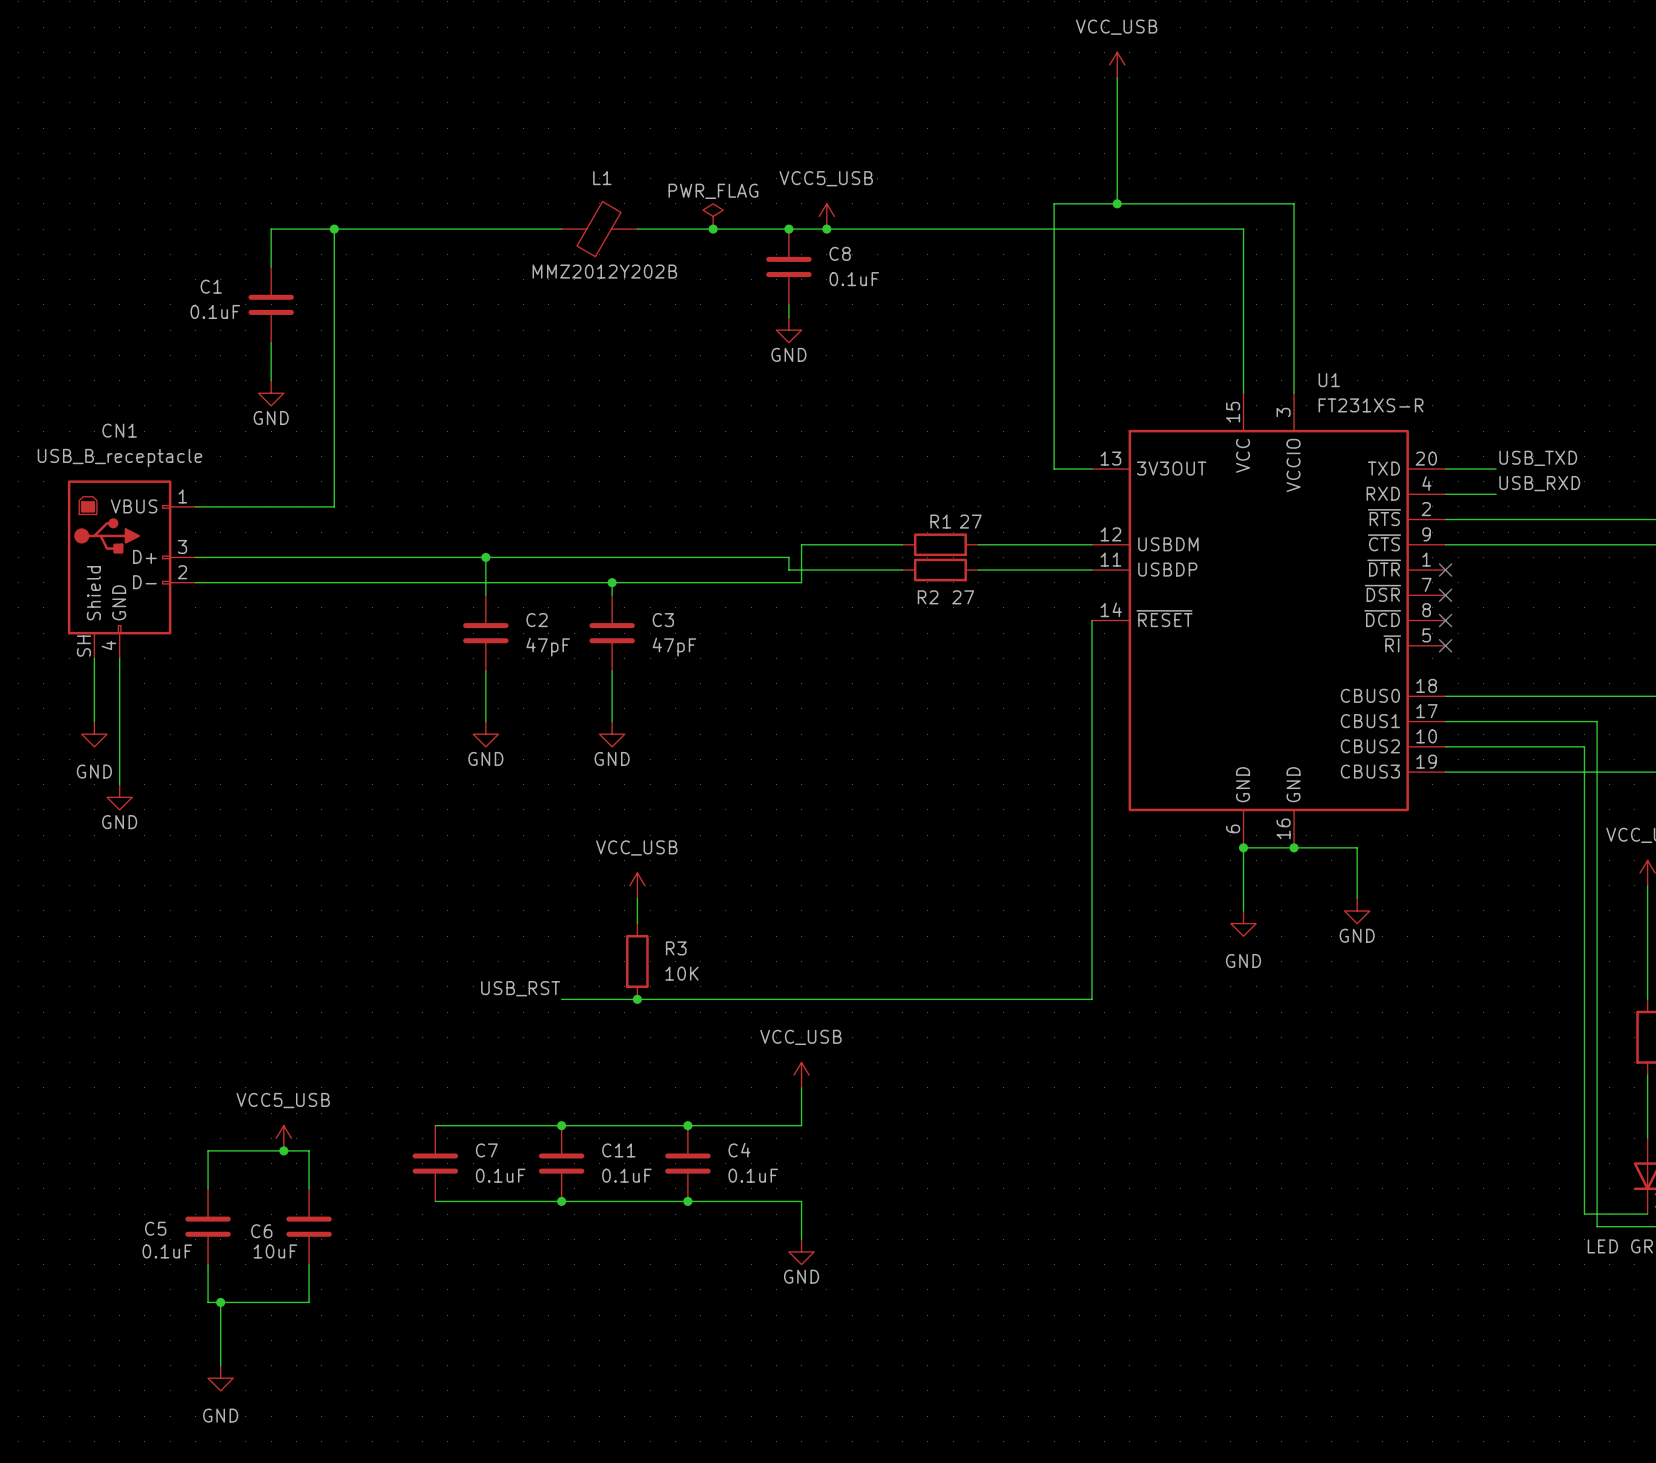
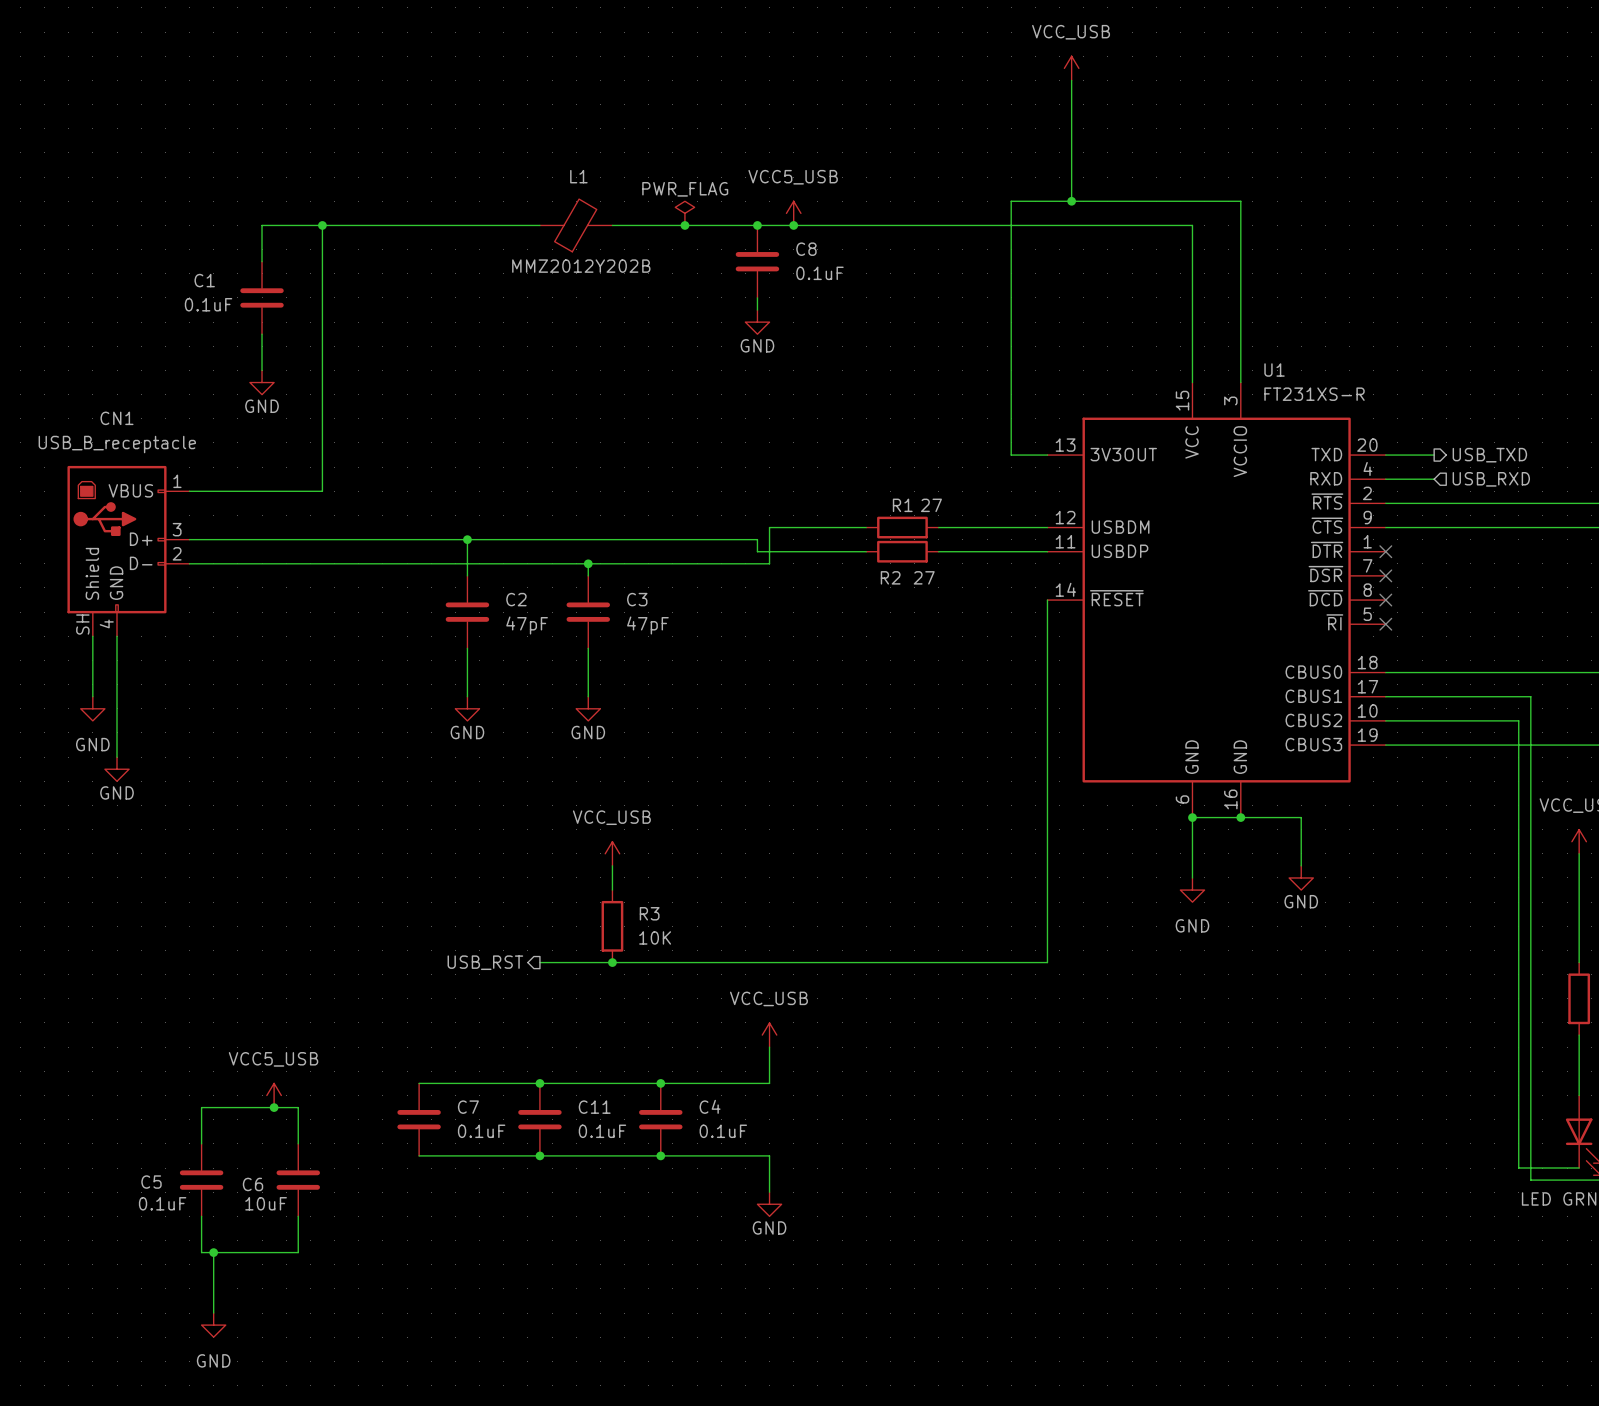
label: USB_TXD (1538, 458) -> none
hierarchical label: none -> USB_TXD (1489, 455)
label: USB_RXD (1539, 483) -> none
hierarchical label: none -> USB_RXD (1491, 479)
label: USB_RST (520, 988) -> none
hierarchical label: none -> USB_RST (485, 962)

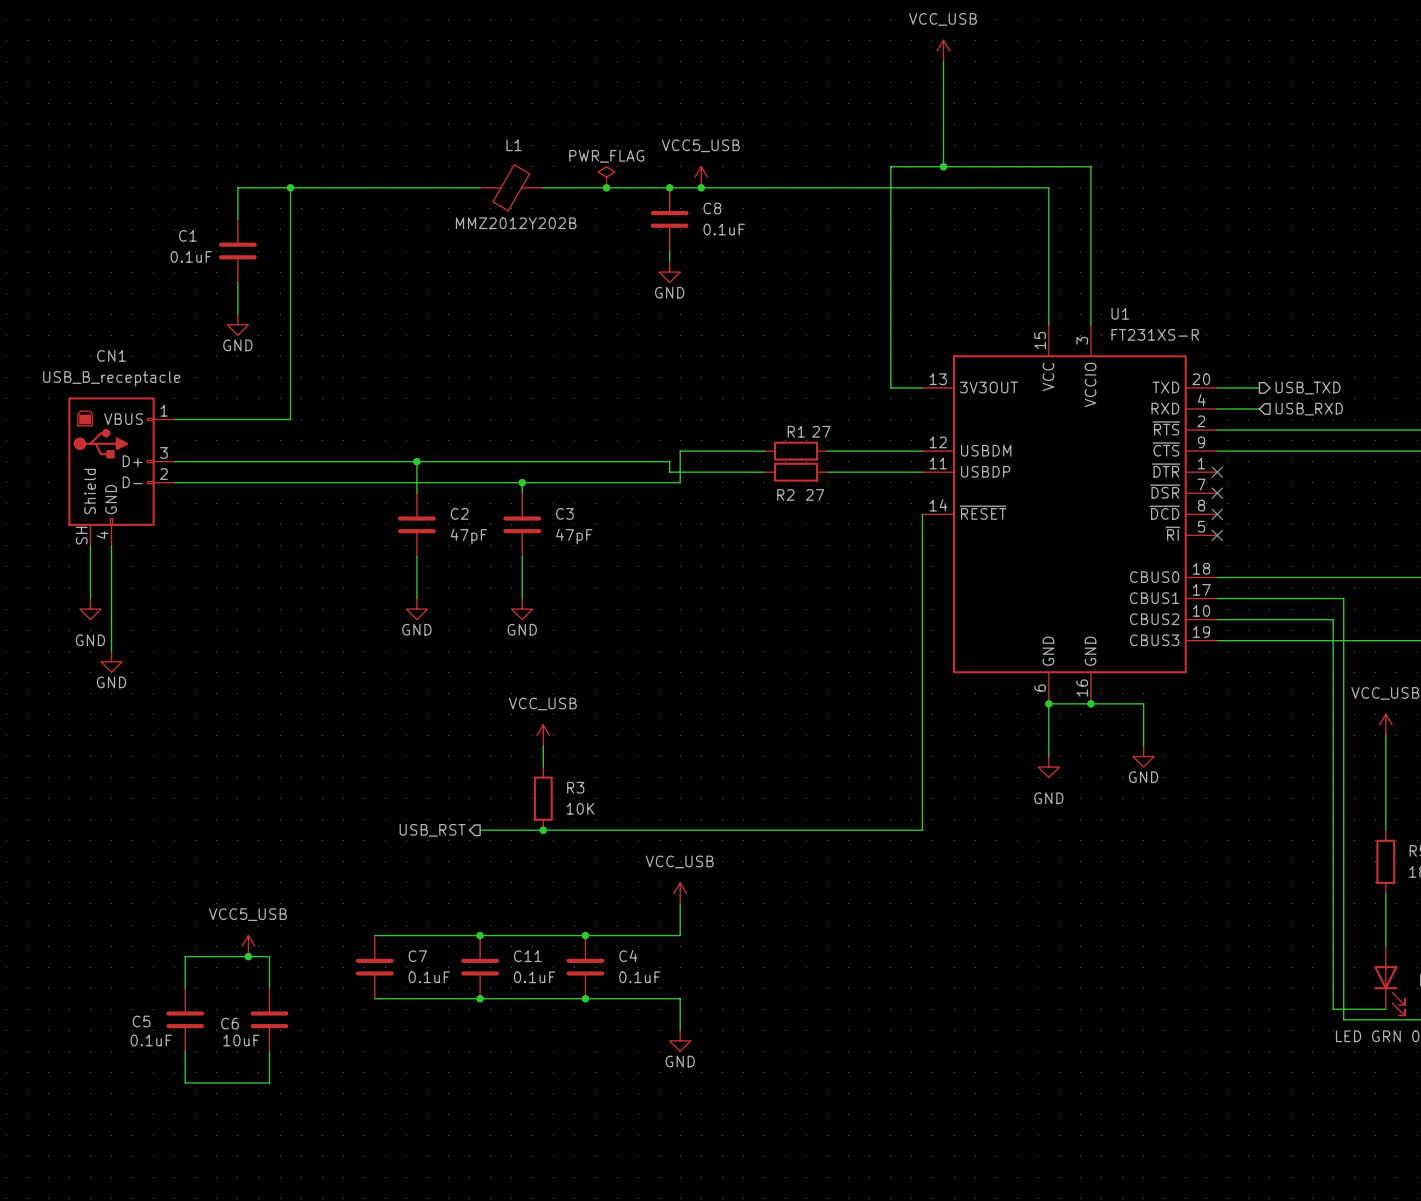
wire: (213, 1252) (213, 1313) -> none
junction: (213, 1252) -> none
power symbol: GND (213, 1325) -> none

